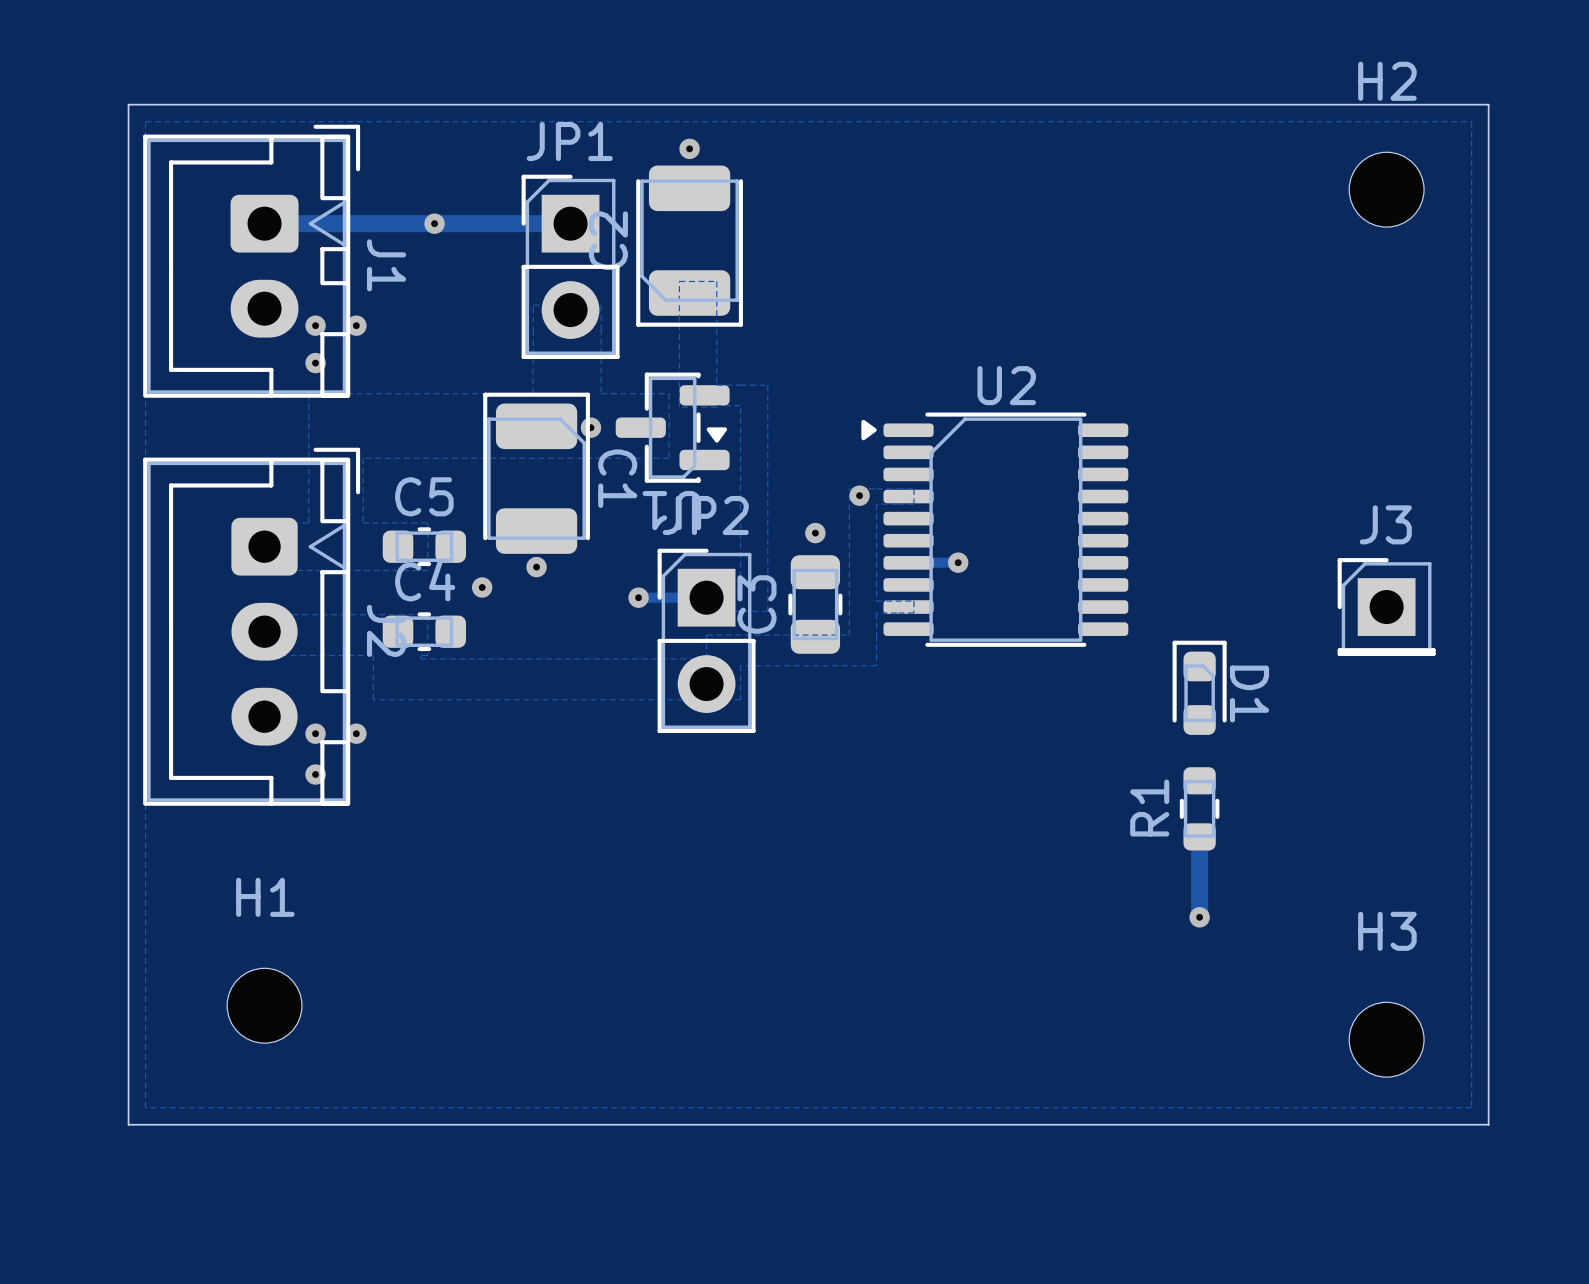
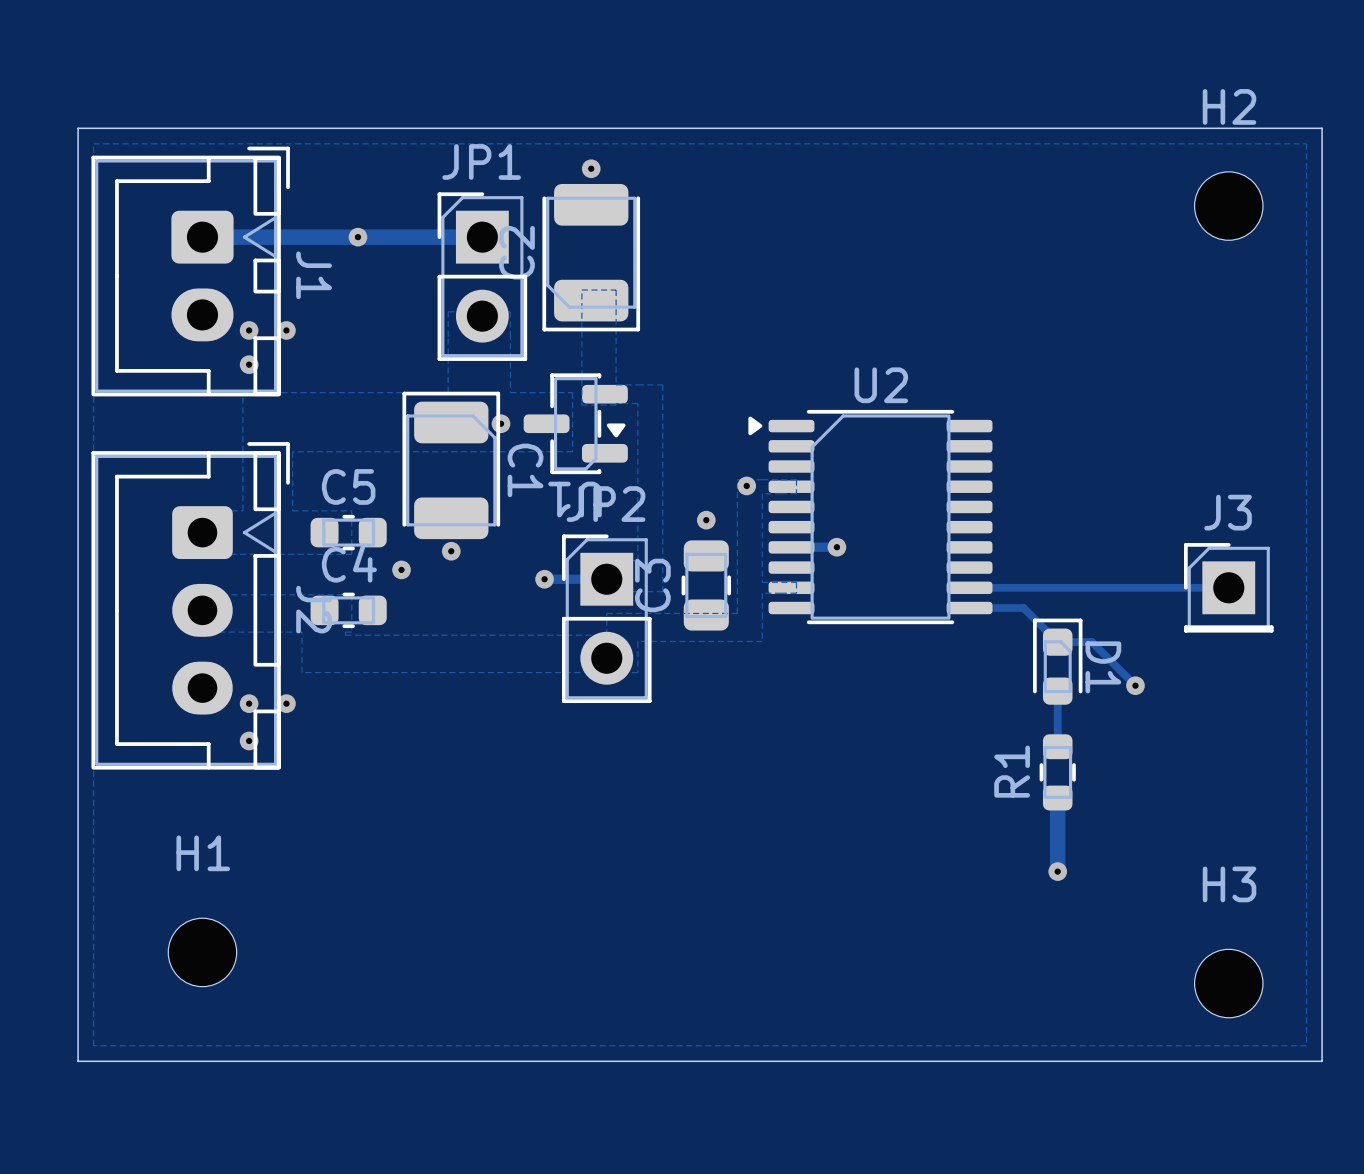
track: none -> (969, 587) (1228, 587)
track: none -> (969, 608) (1023, 608) (1057, 642) (1091, 642) (1135, 685)
via: none -> (1135, 685)
track: none -> (1057, 691) (1057, 746)

